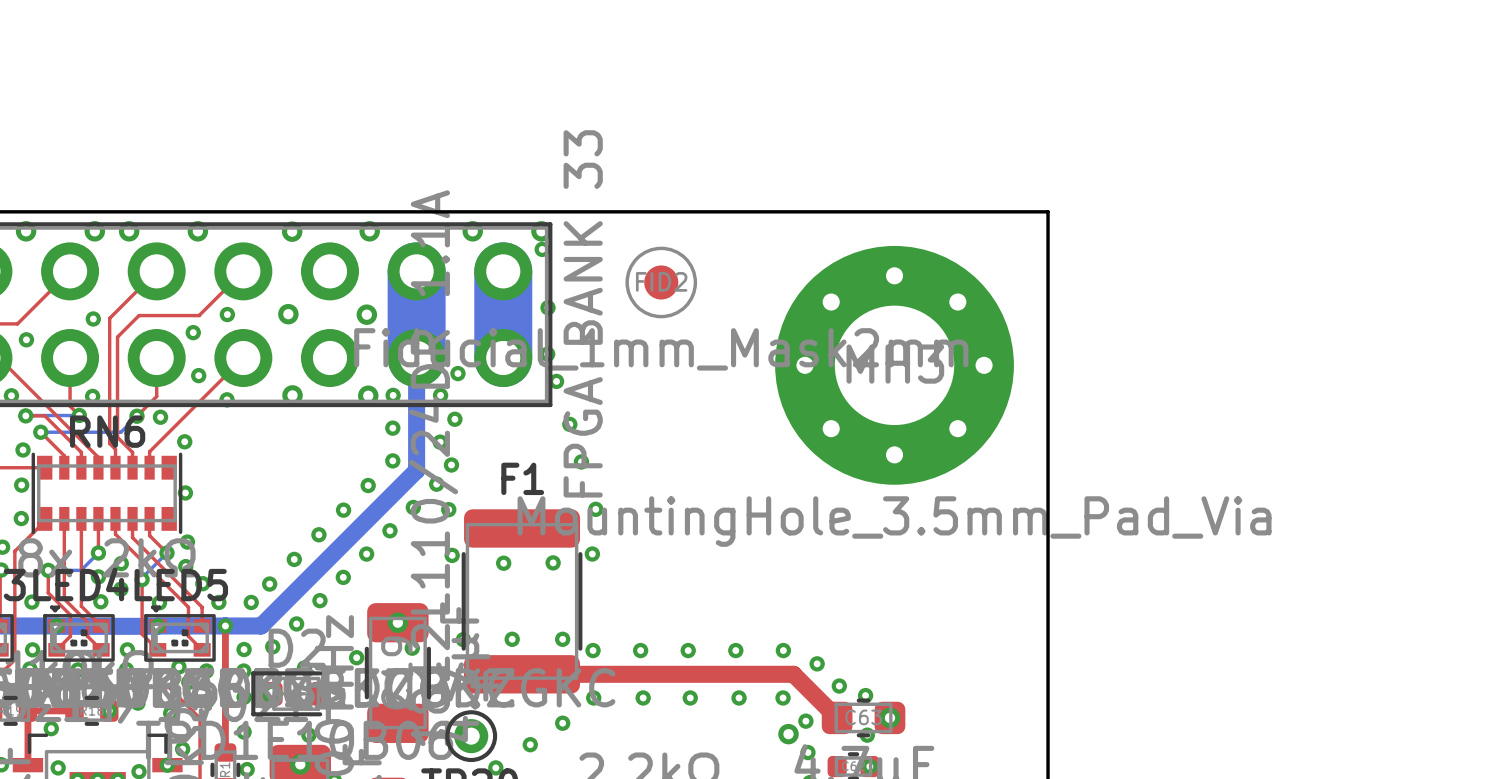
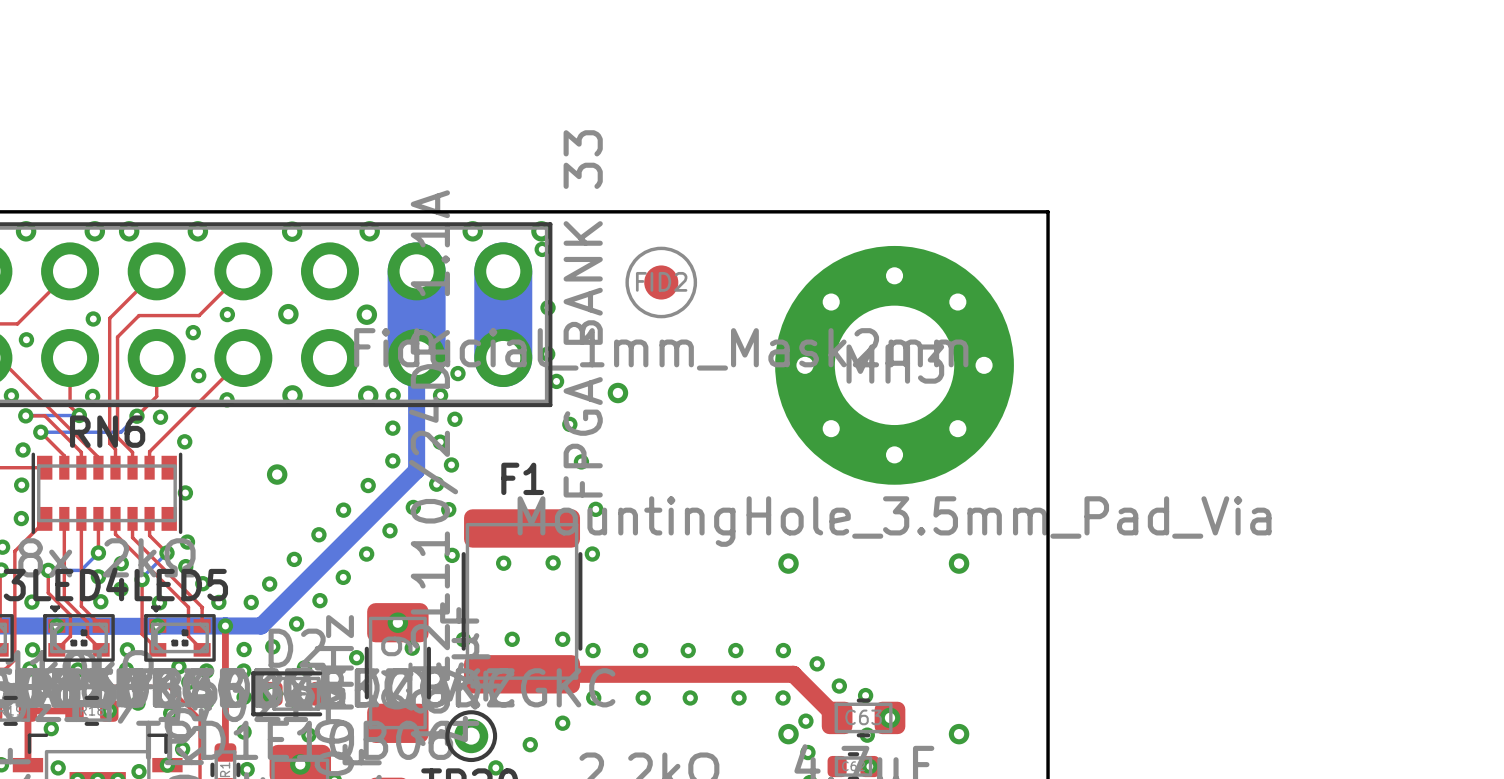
via: none -> (617, 393)
via: none -> (277, 474)
via: none -> (788, 563)
via: none -> (959, 563)
via: none -> (959, 734)

